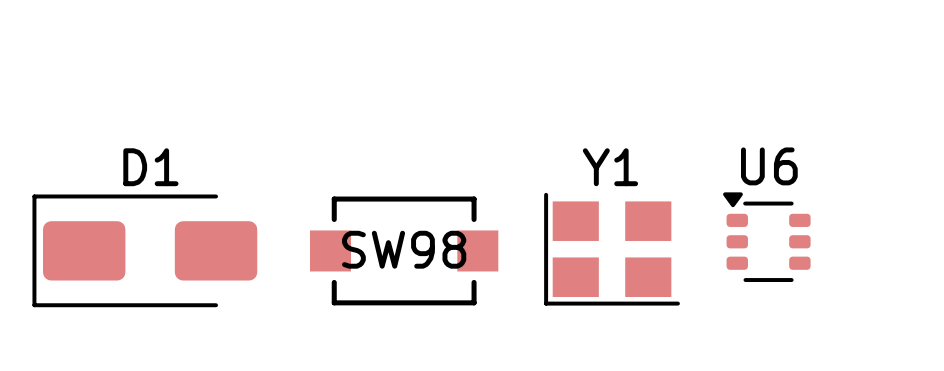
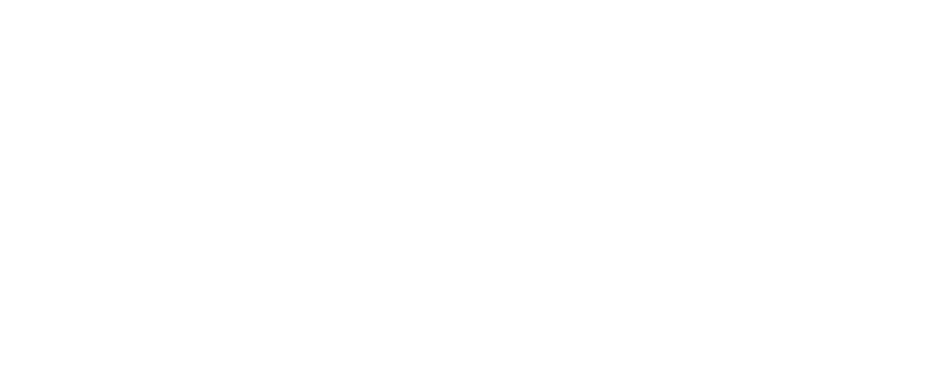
U6: (766, 237) -> none
Y1: (612, 249) -> none
D1: (144, 250) -> none
SW98: (404, 250) -> none

